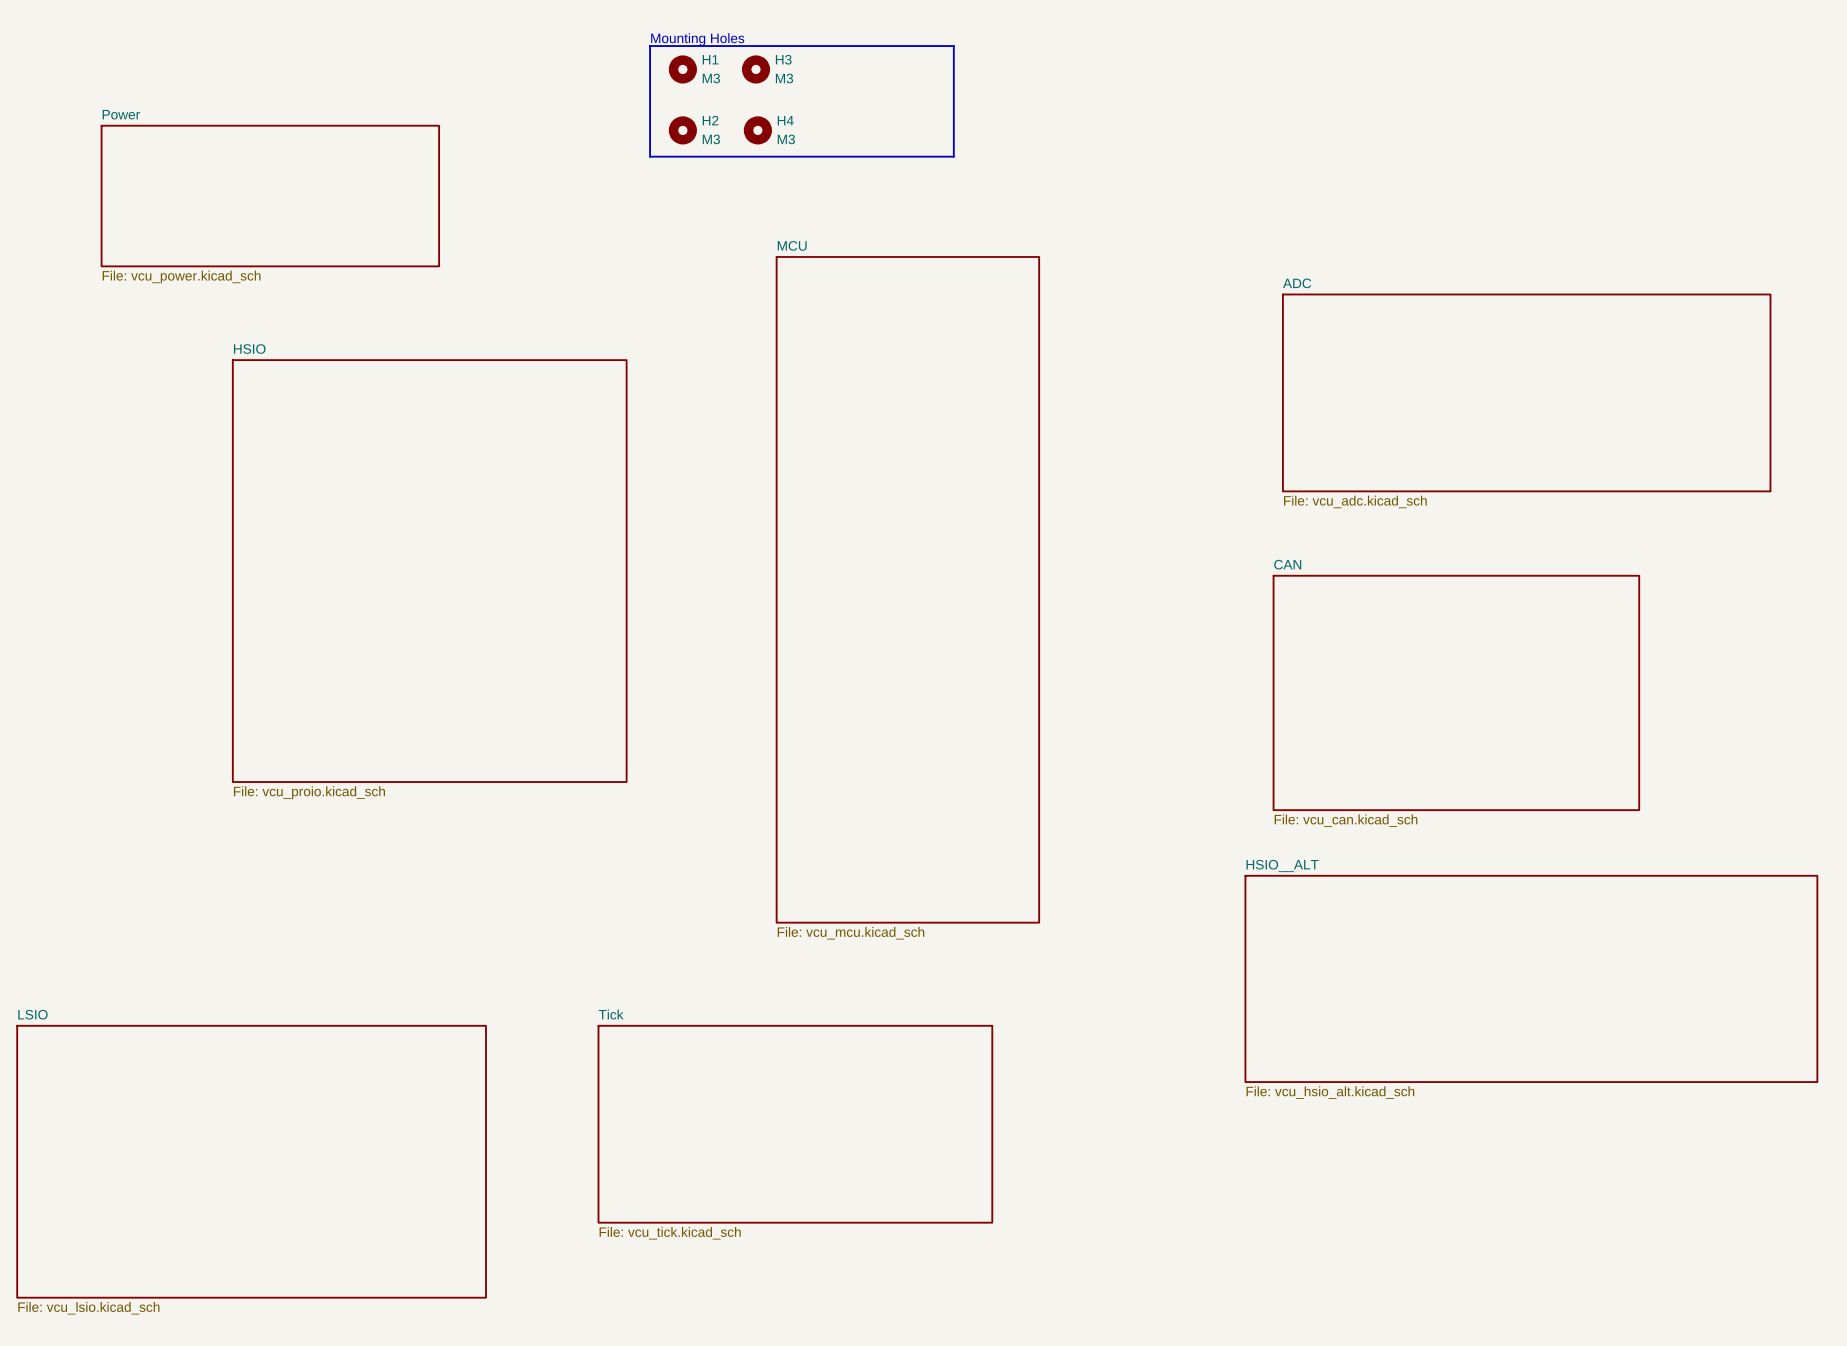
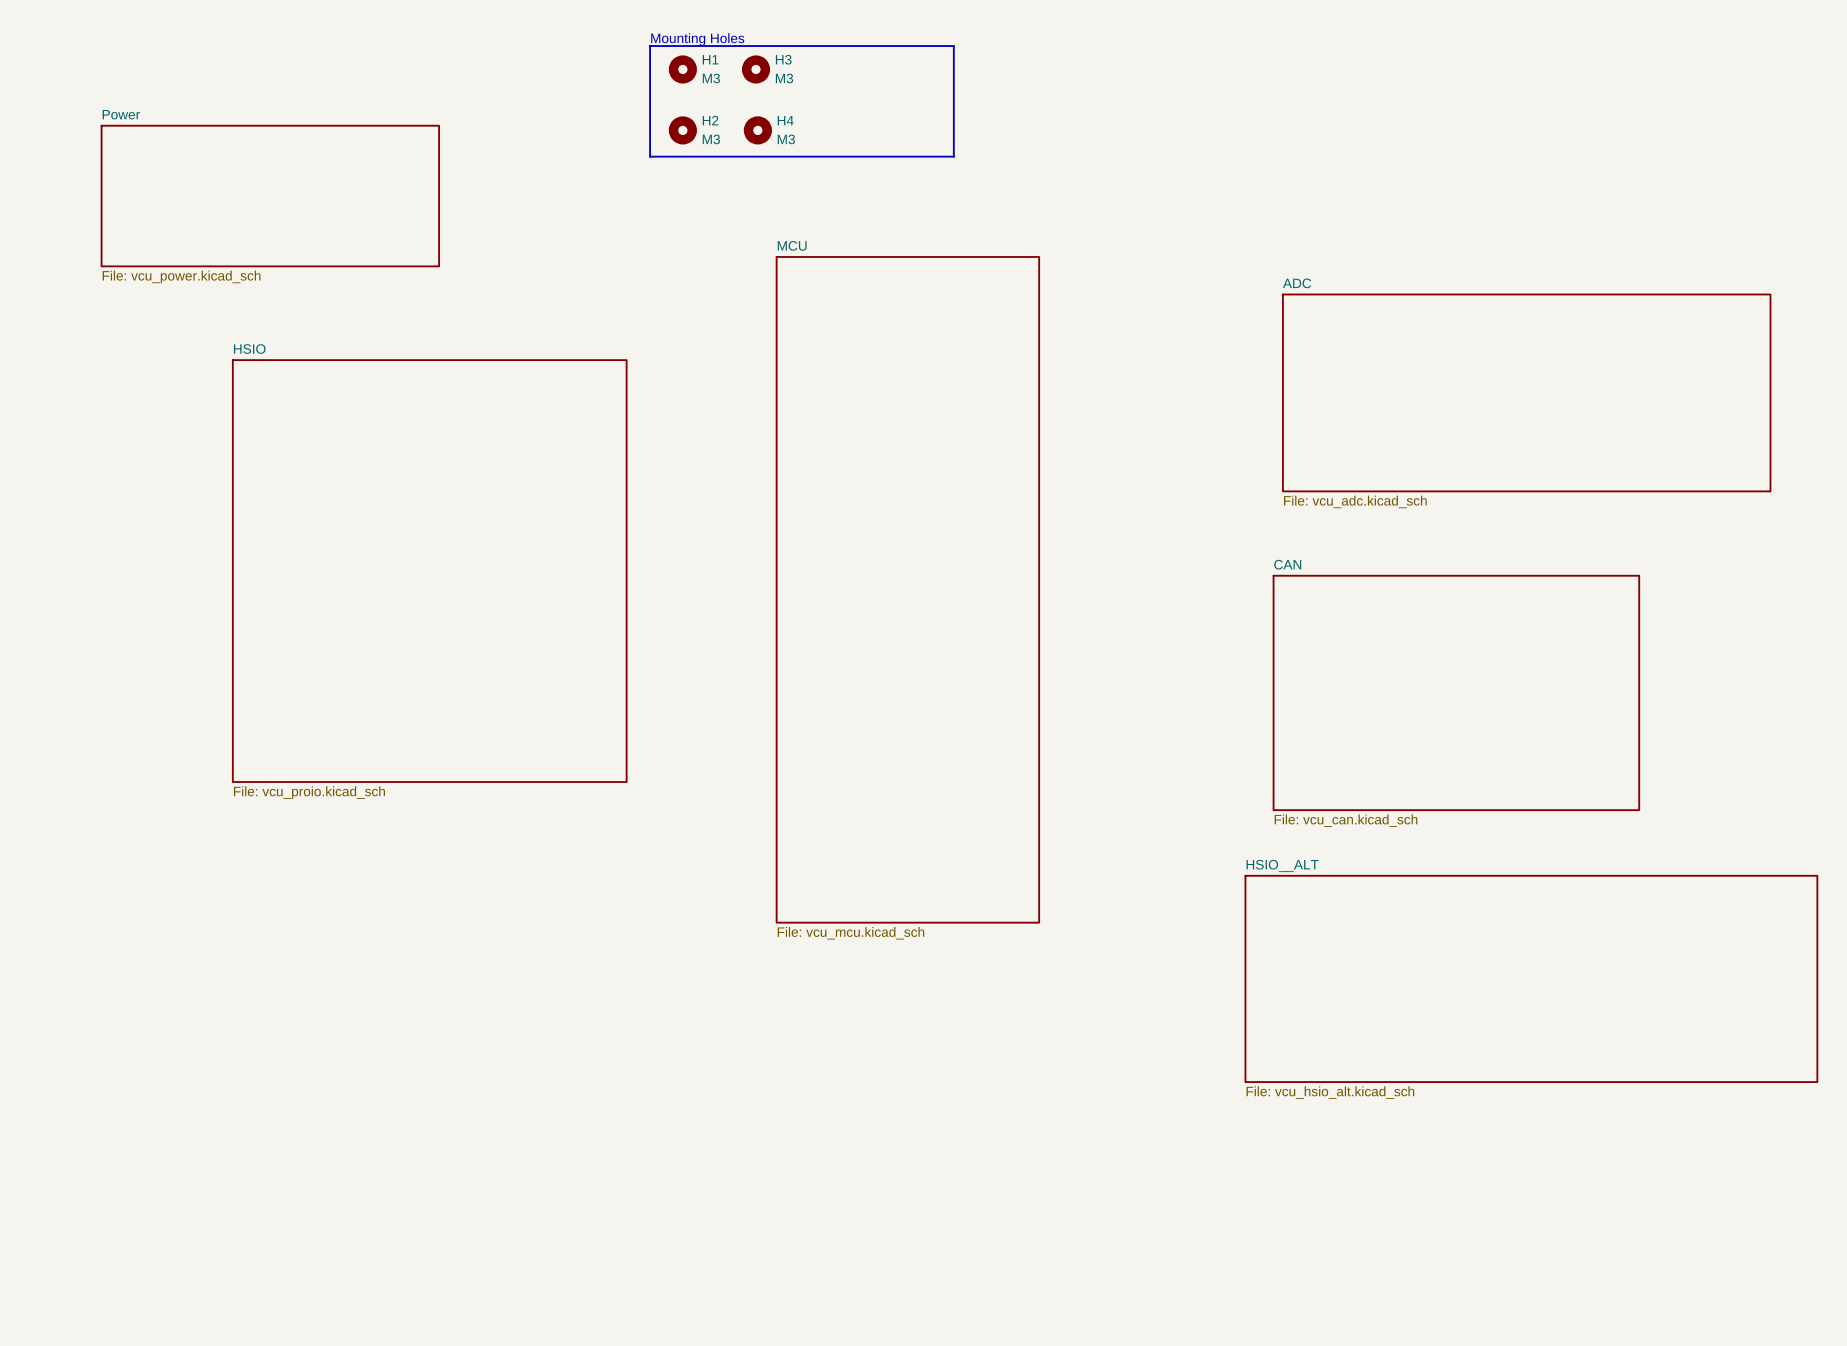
sheet Tick: File: vcu_tick.kicad_sch (795, 1124) -> none
sheet LSIO: File: vcu_lsio.kicad_sch (251, 1161) -> none

